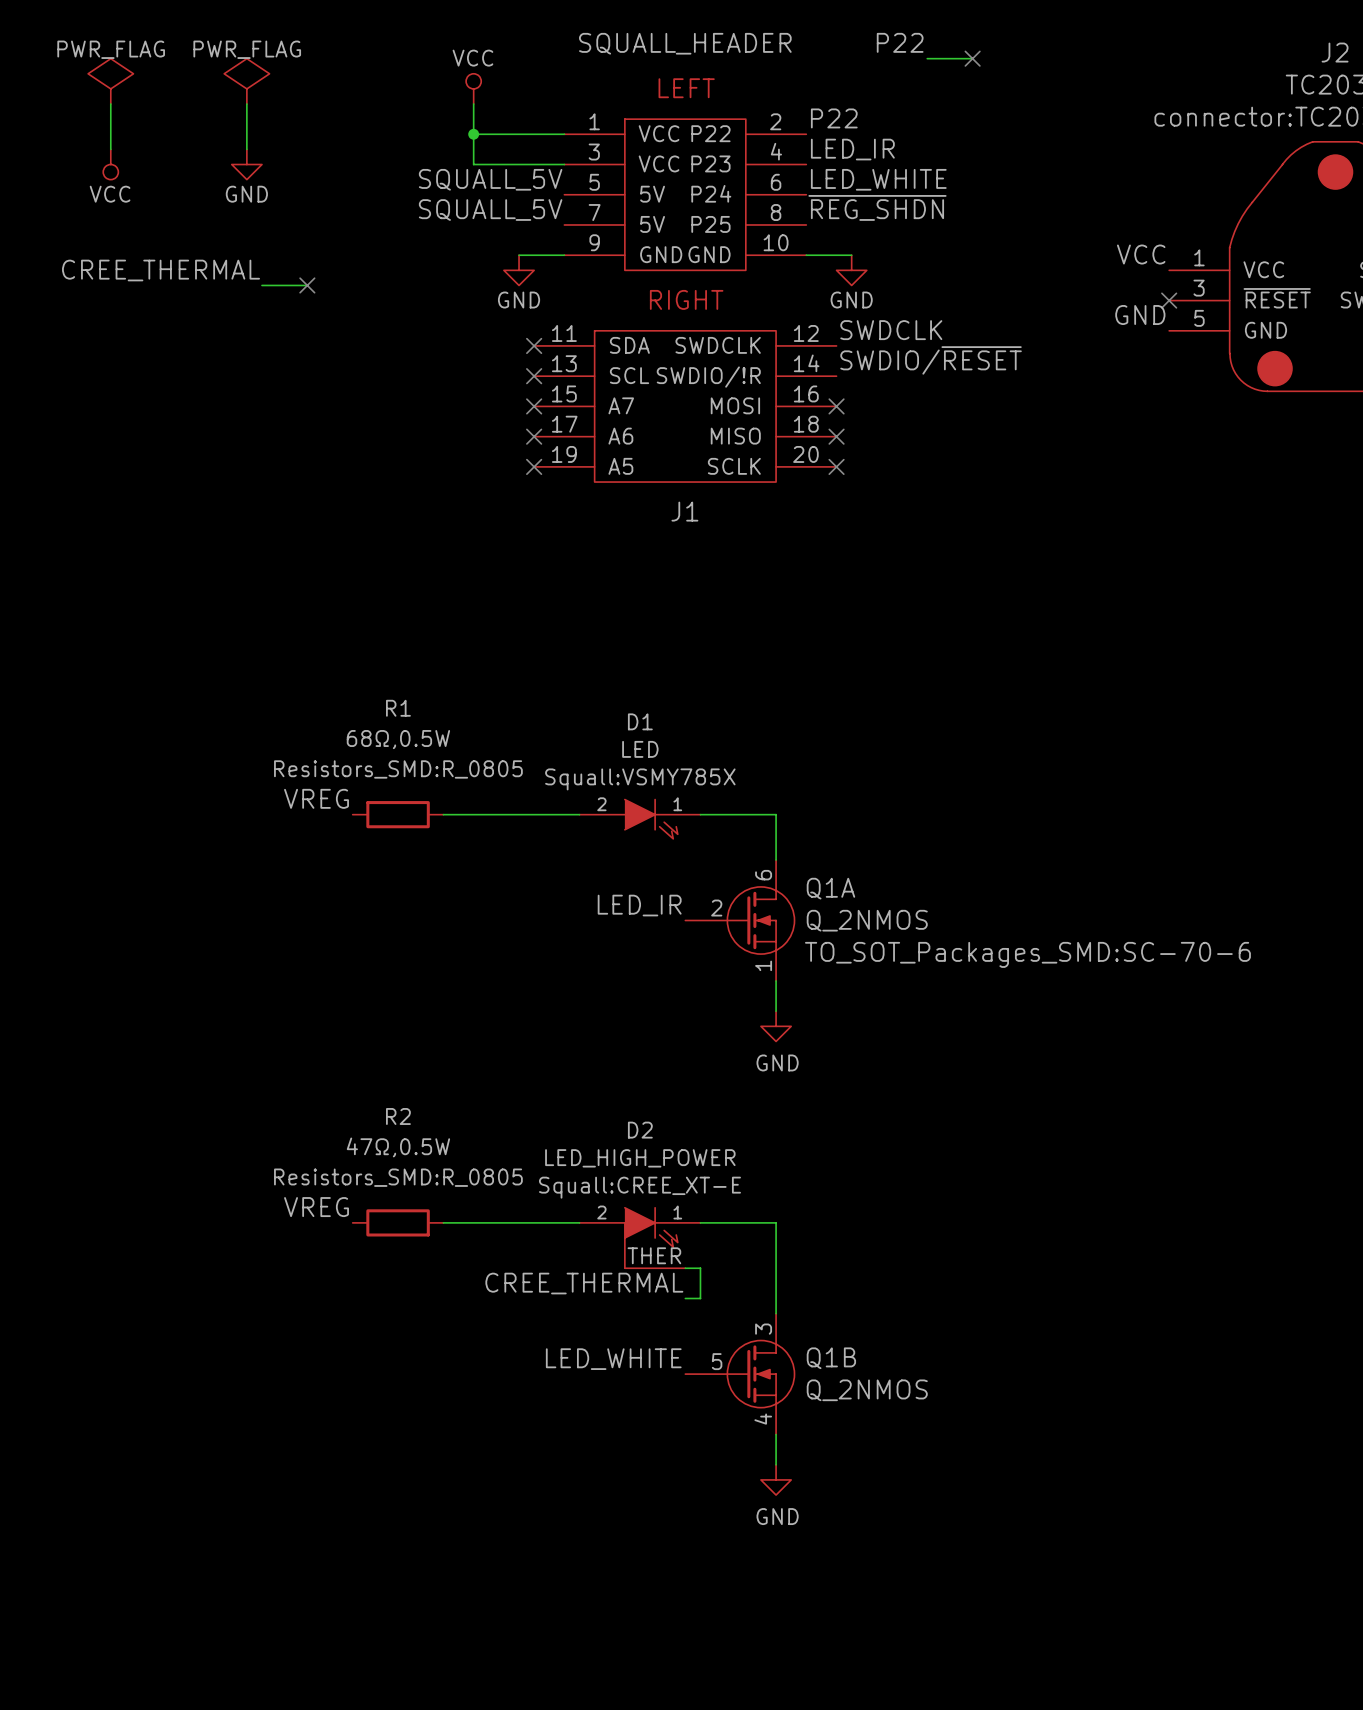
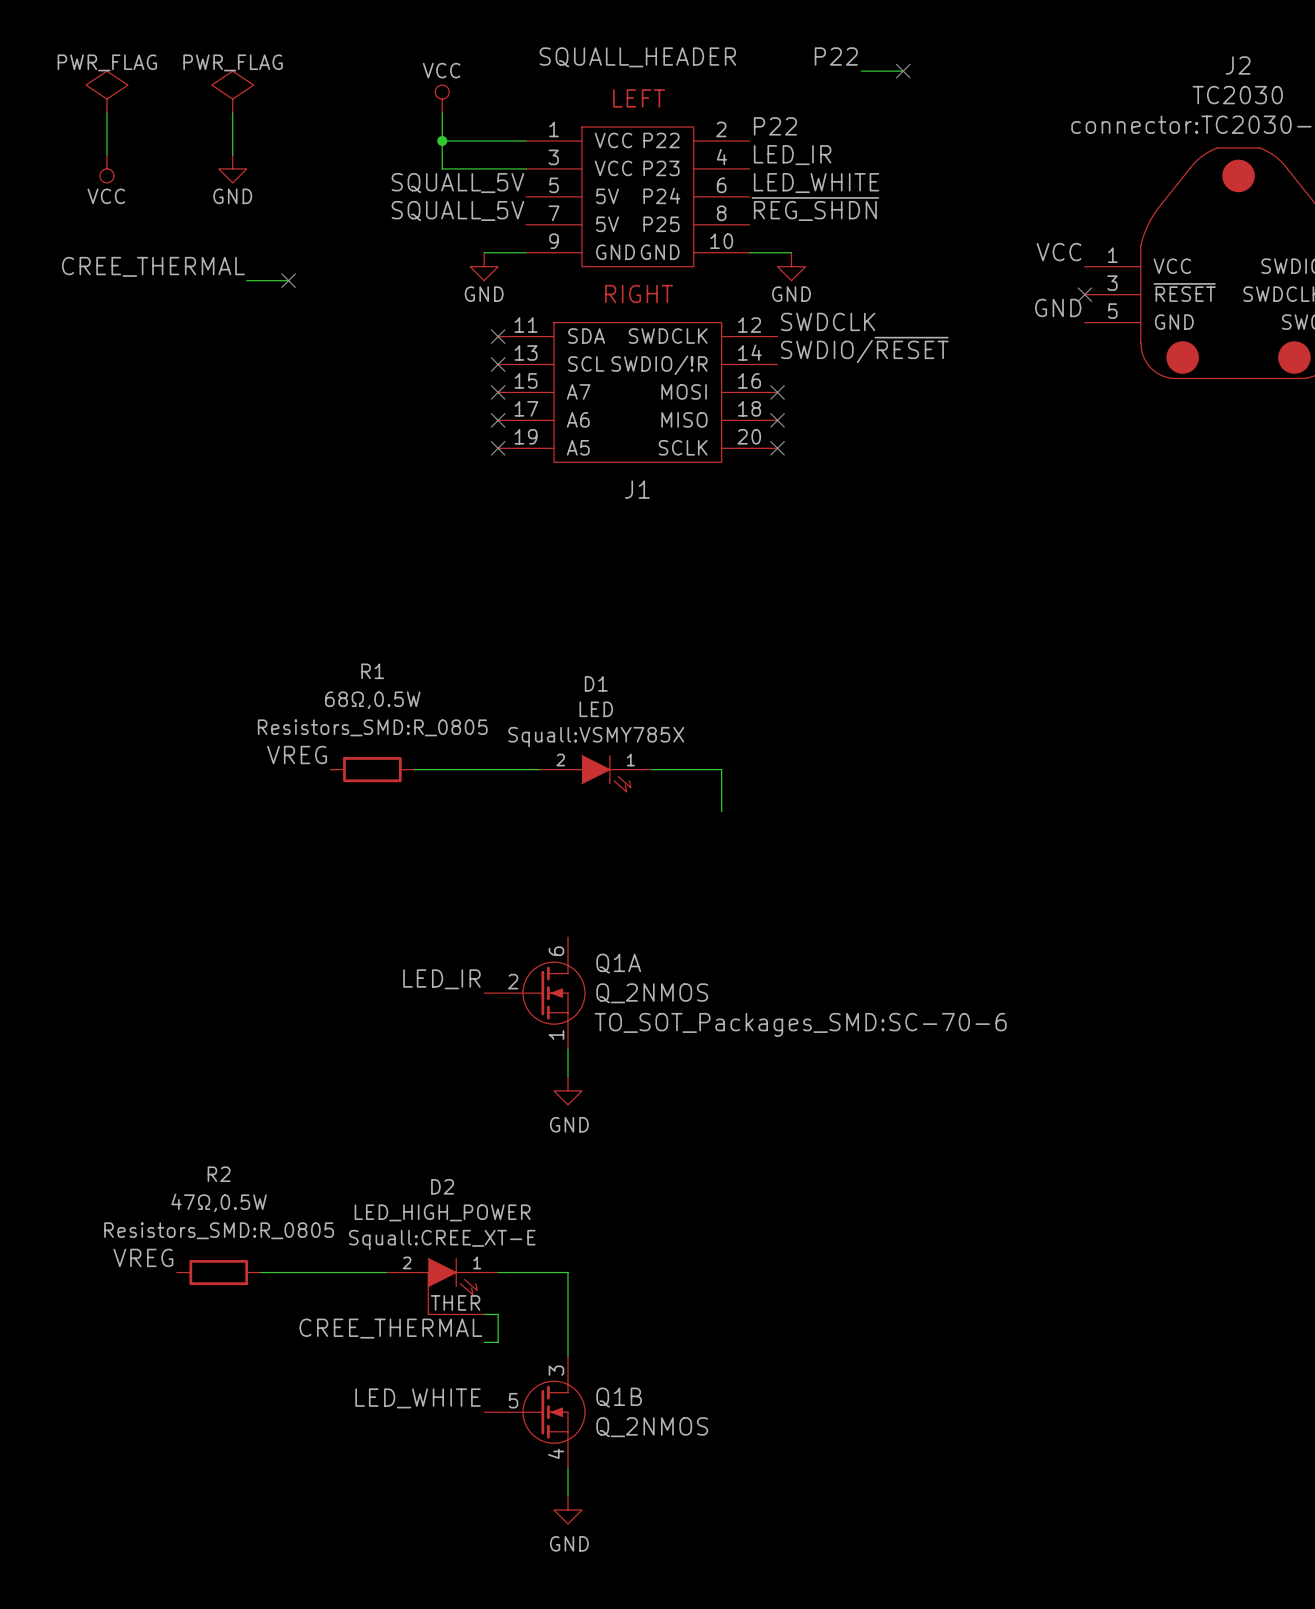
label position: LED_IR (639, 905) -> LED_IR (441, 979)
Q1A position: (739, 920) -> (534, 993)
wire: (776, 980) (776, 1011) -> (567, 1049) (567, 1076)
power symbol: GND (776, 1026) -> none
power symbol: none -> GND (567, 1090)
label position: VREG (316, 1207) -> VREG (143, 1257)
R2 position: (398, 1222) -> (218, 1272)
wire: (443, 1222) (579, 1222) -> (260, 1272) (386, 1272)
wire: (700, 1222) (776, 1222) (776, 1313) -> (498, 1272) (567, 1272) (567, 1356)
D2 position: (639, 1238) -> (442, 1286)
wire: (685, 1268) (700, 1268) (700, 1298) (685, 1298) -> (484, 1314) (498, 1314) (498, 1342) (484, 1342)
label position: CREE_THERMAL (584, 1283) -> CREE_THERMAL (390, 1328)
label position: LED_WHITE (613, 1359) -> LED_WHITE (418, 1398)
Q1B position: (739, 1374) -> (534, 1412)
wire: (776, 1434) (776, 1464) -> (567, 1468) (567, 1496)
power symbol: GND (776, 1479) -> none
power symbol: none -> GND (567, 1510)

